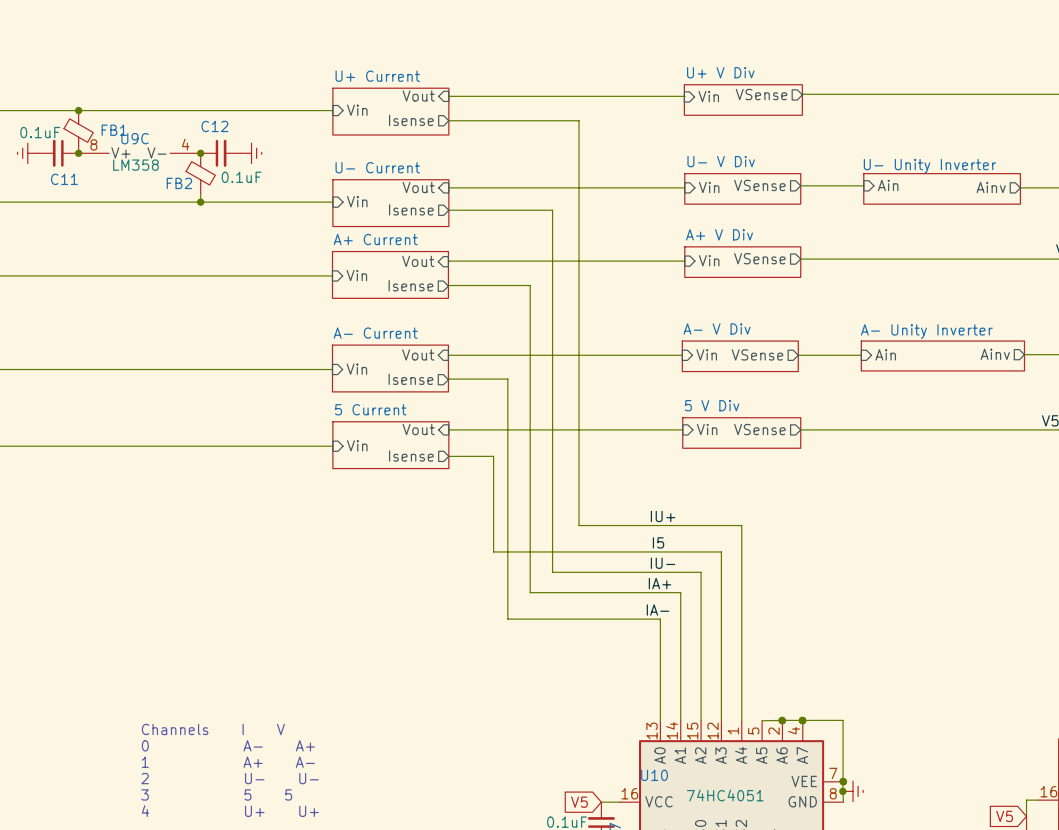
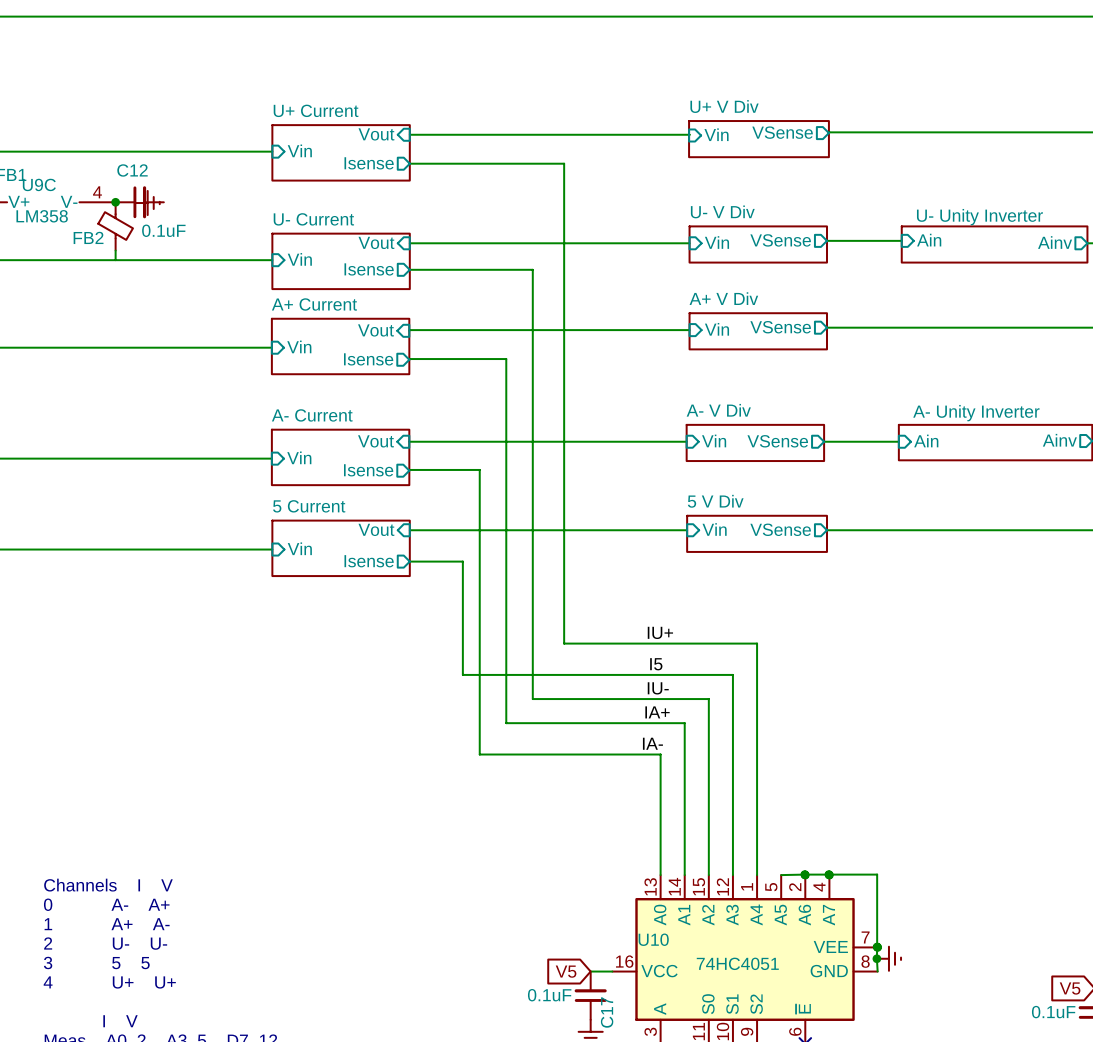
power symbol position: (251, 153) -> (147, 203)
junction: (200, 202) -> none

